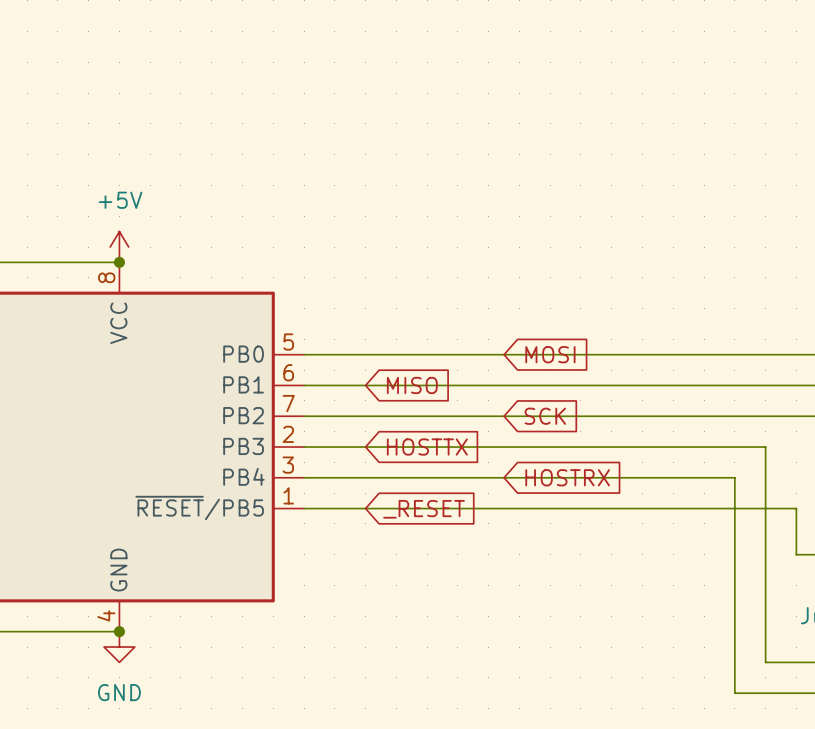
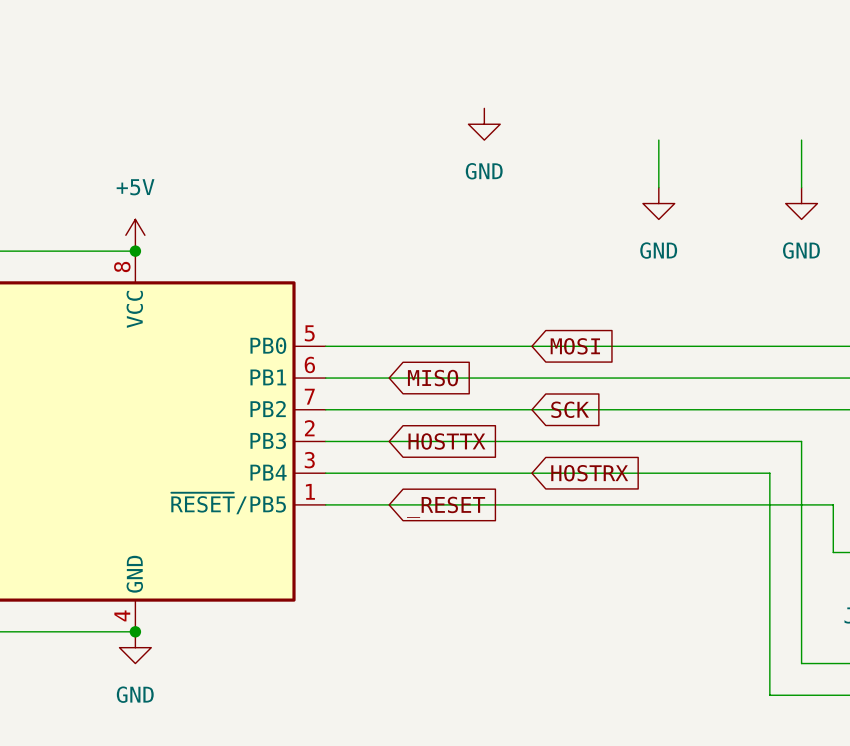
power symbol: none -> GND (484, 124)
wire: none -> (658, 140) (658, 187)
wire: none -> (801, 140) (801, 187)
power symbol: none -> GND (658, 203)
power symbol: none -> GND (801, 203)

